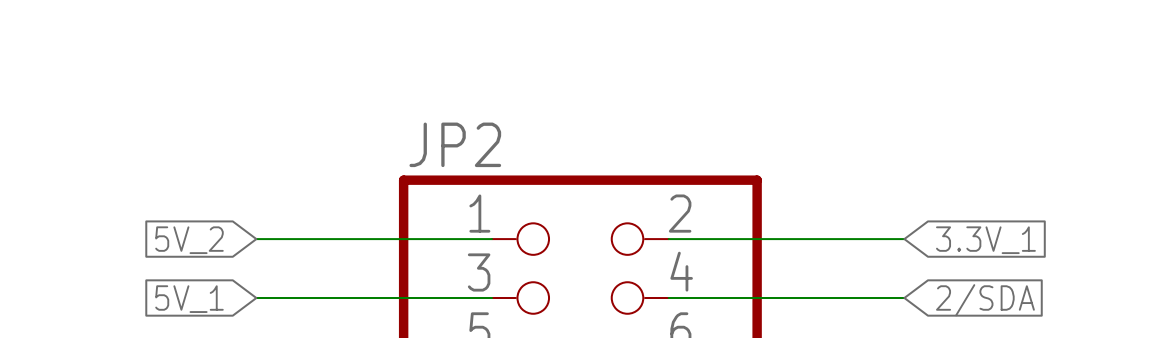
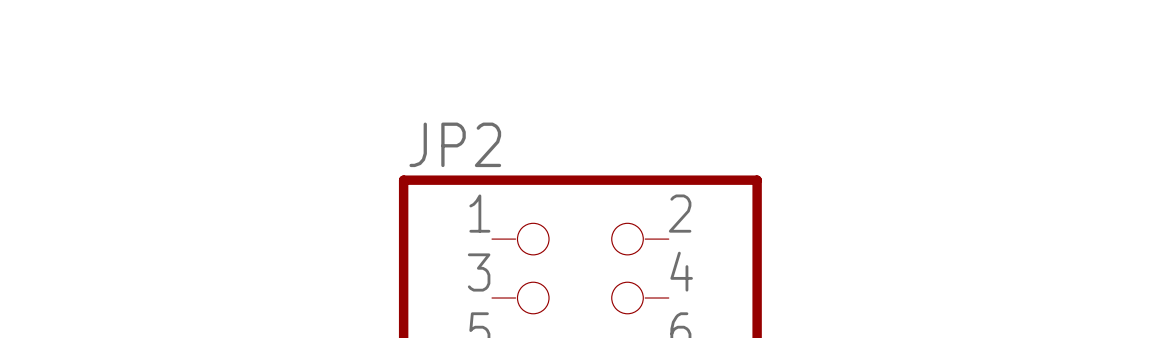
wire: (256, 239) (492, 239) -> none
wire: (668, 239) (904, 239) -> none
global label: 5V_2 (189, 240) -> none
global label: 3.3V_1 (985, 240) -> none
wire: (256, 298) (492, 298) -> none
wire: (668, 298) (904, 298) -> none
global label: 5V_1 (189, 299) -> none
global label: 2/SDA (985, 300) -> none

